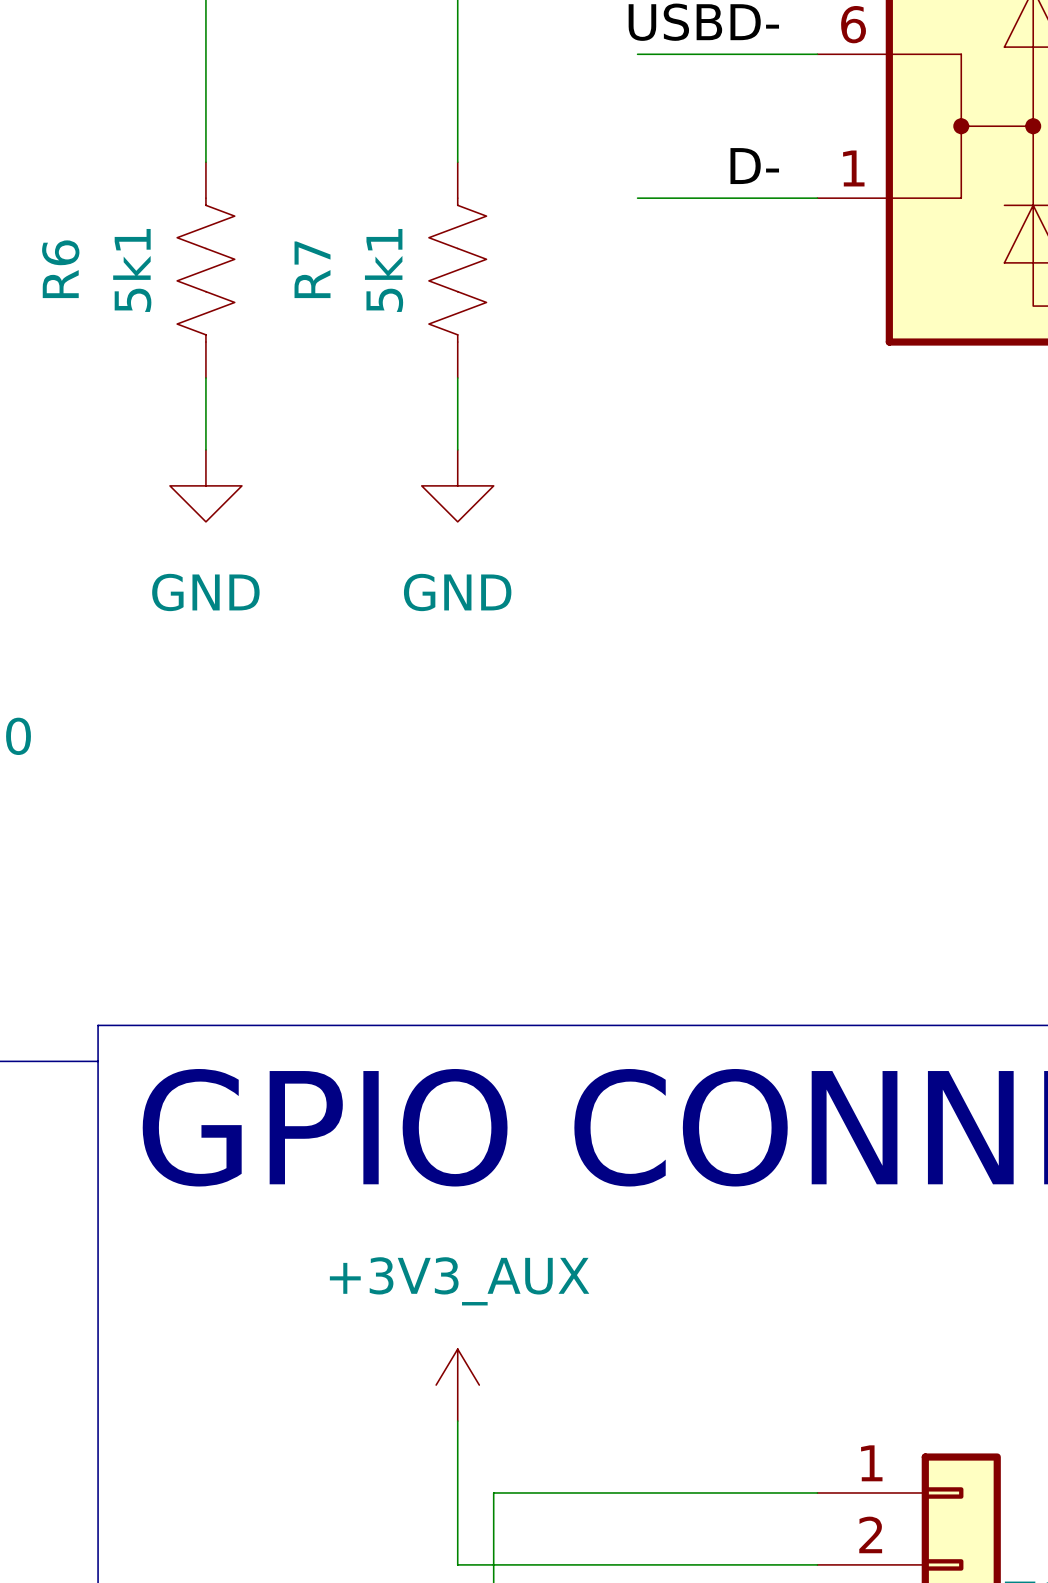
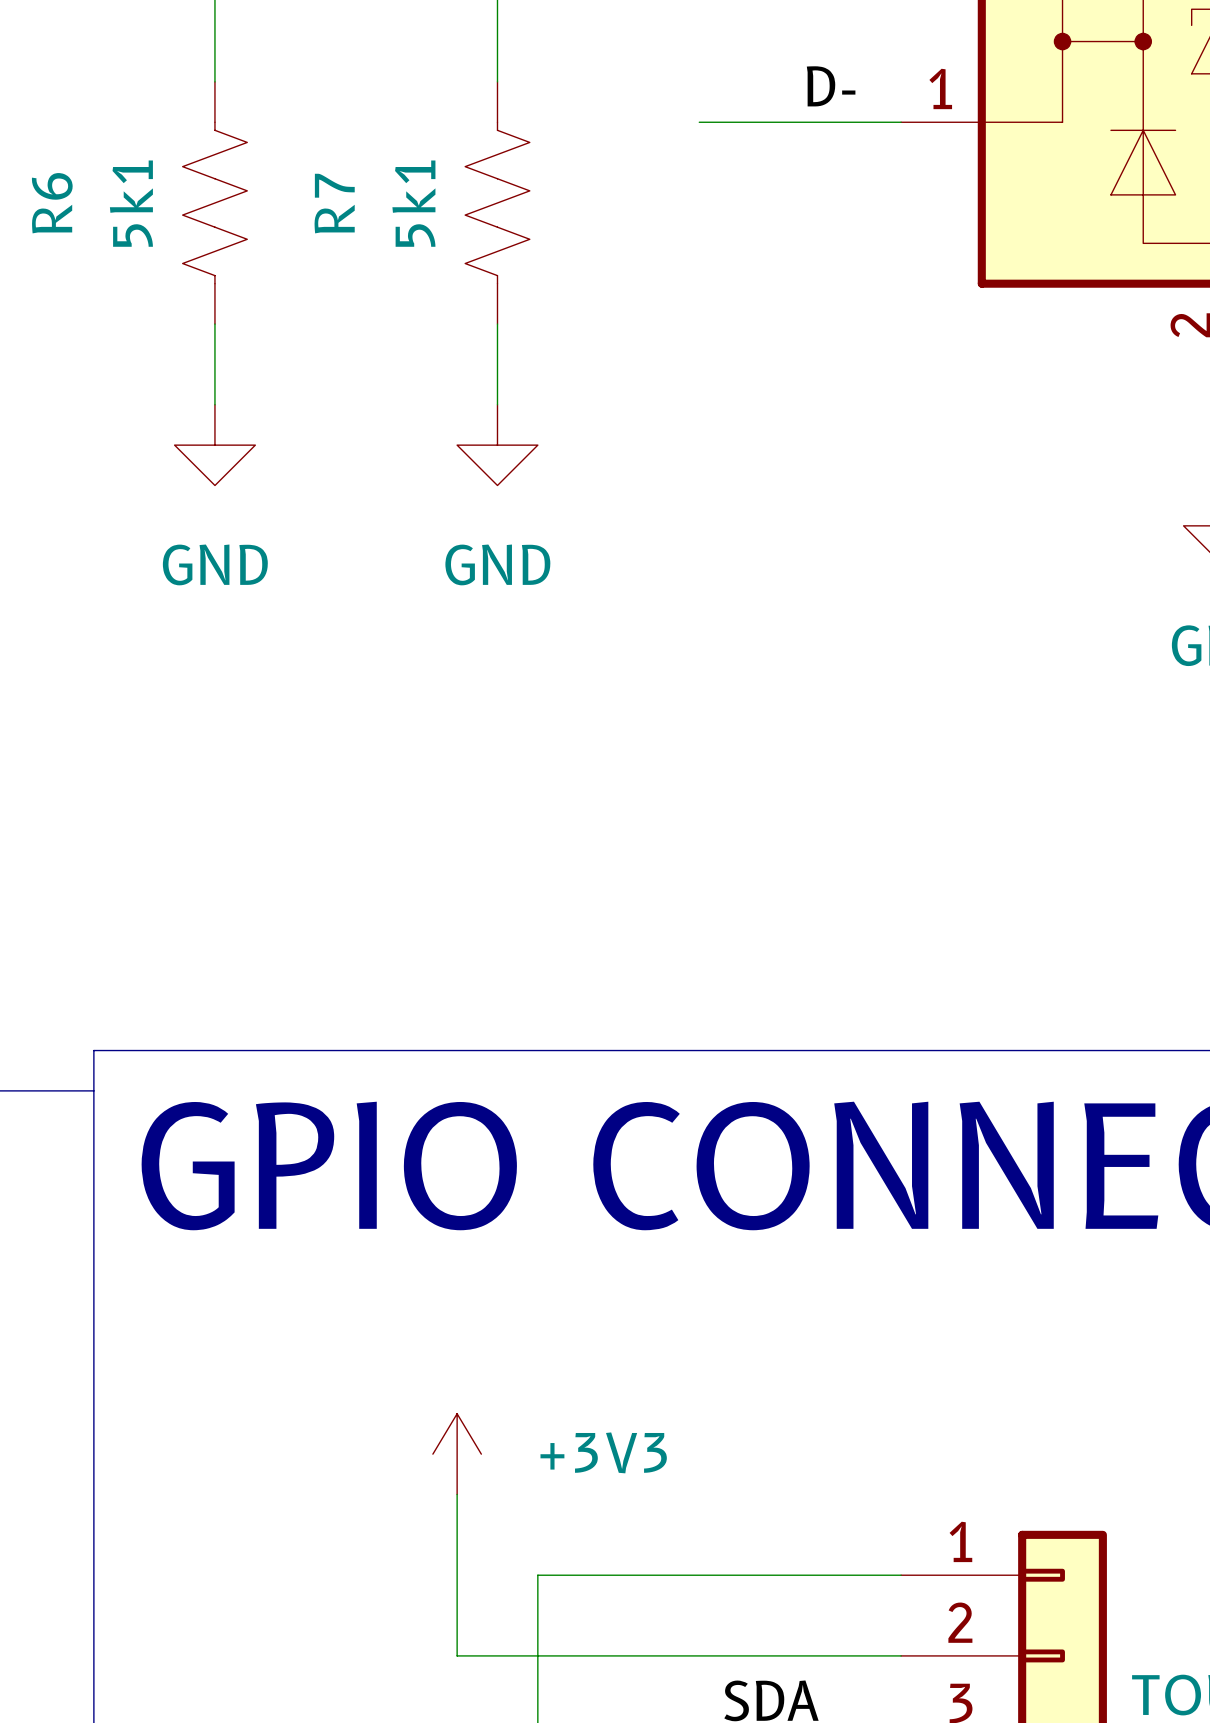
power symbol: none -> +3V3 (457, 1454)
power symbol: +3V3_AUX (457, 1385) -> none
wire: (457, 1421) (457, 1564) -> (457, 1494) (457, 1655) (497, 1655)

